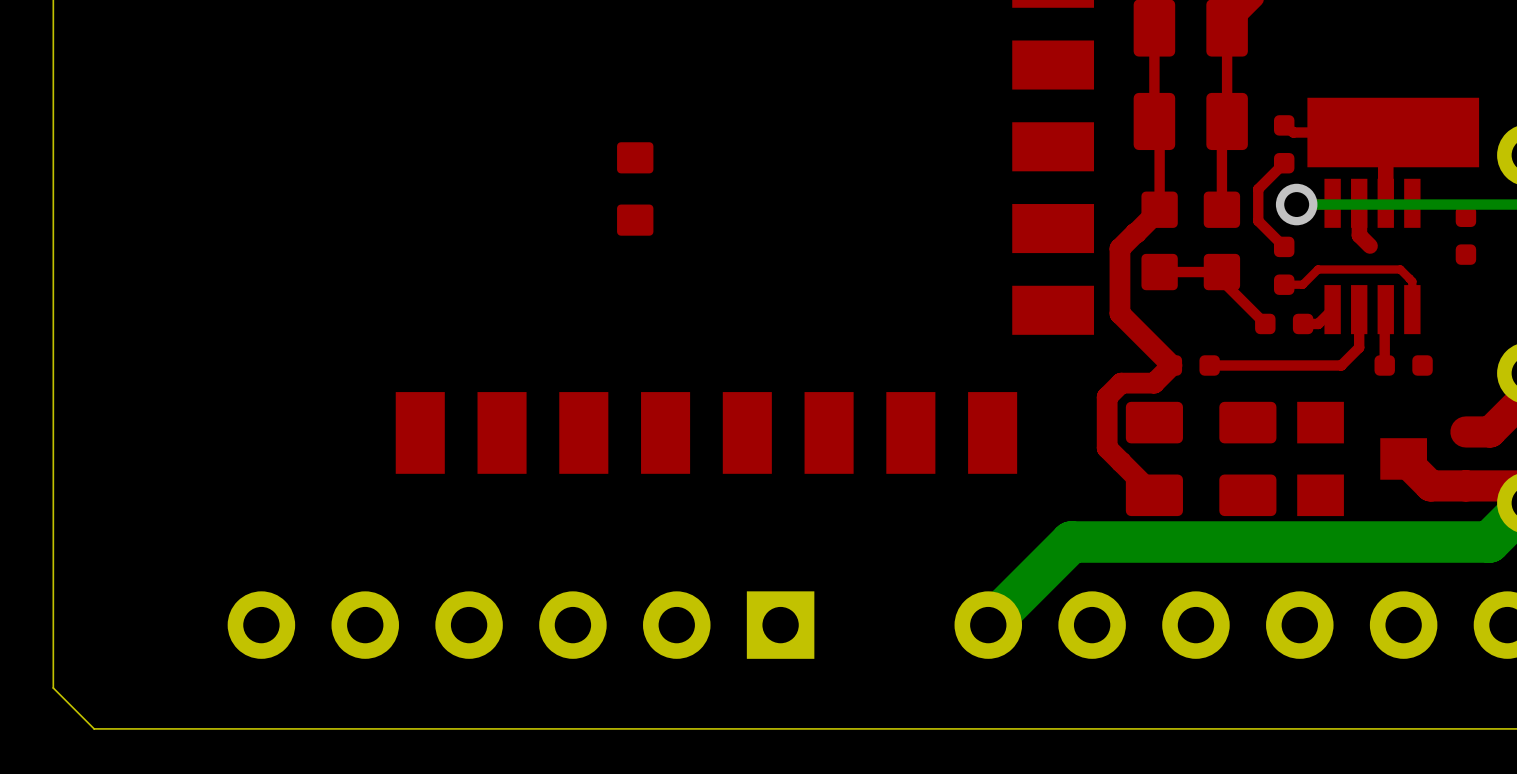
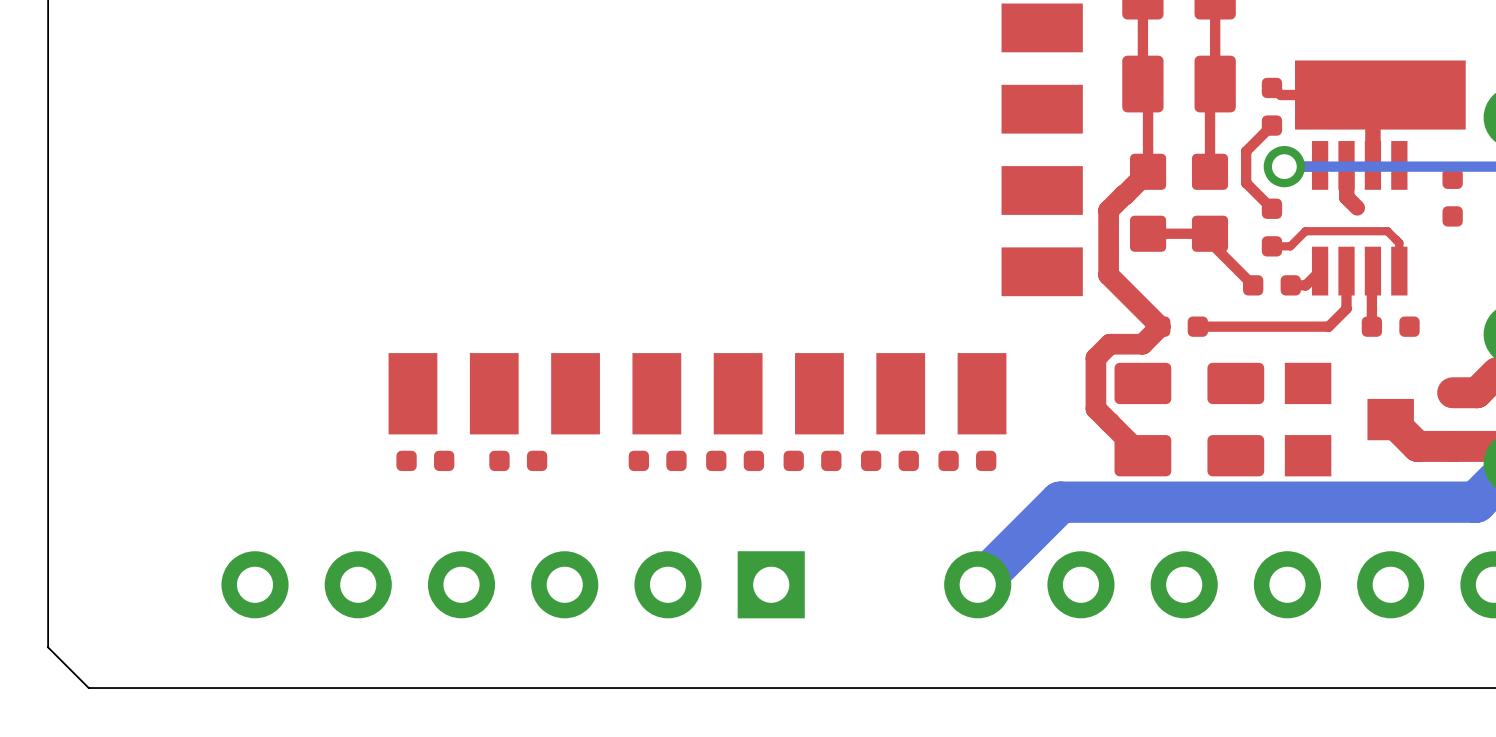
part: (635, 188) -> none
part: none -> (425, 460)
part: none -> (518, 460)
part: none -> (657, 460)
part: none -> (735, 460)
part: none -> (812, 460)
part: none -> (889, 460)
part: none -> (967, 460)

